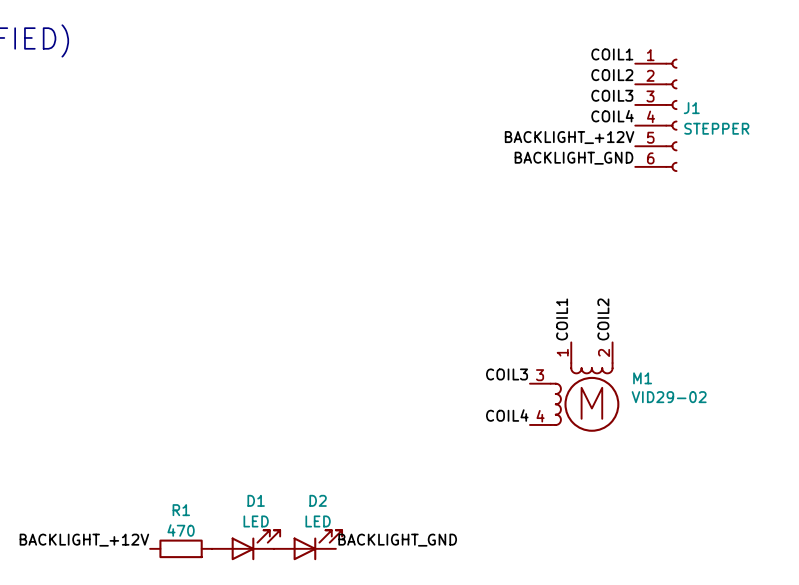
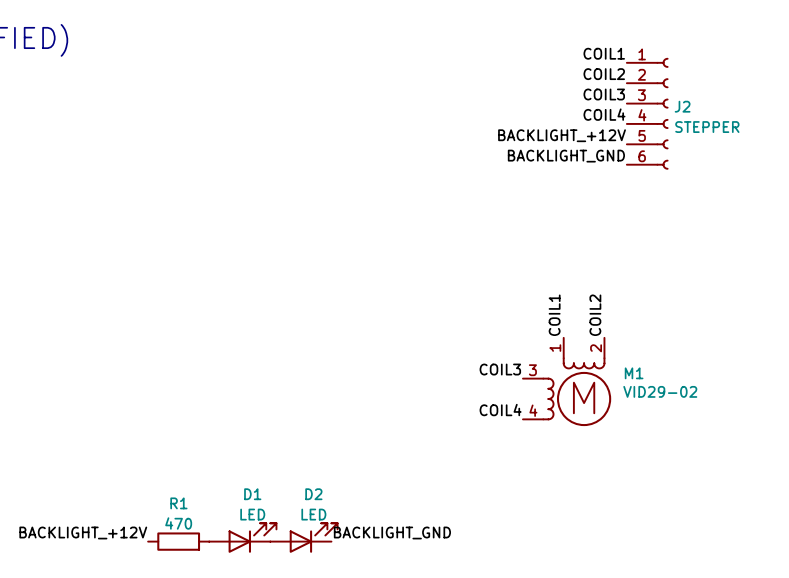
J1 name: J1 (691, 108) -> J2 (682, 106)

